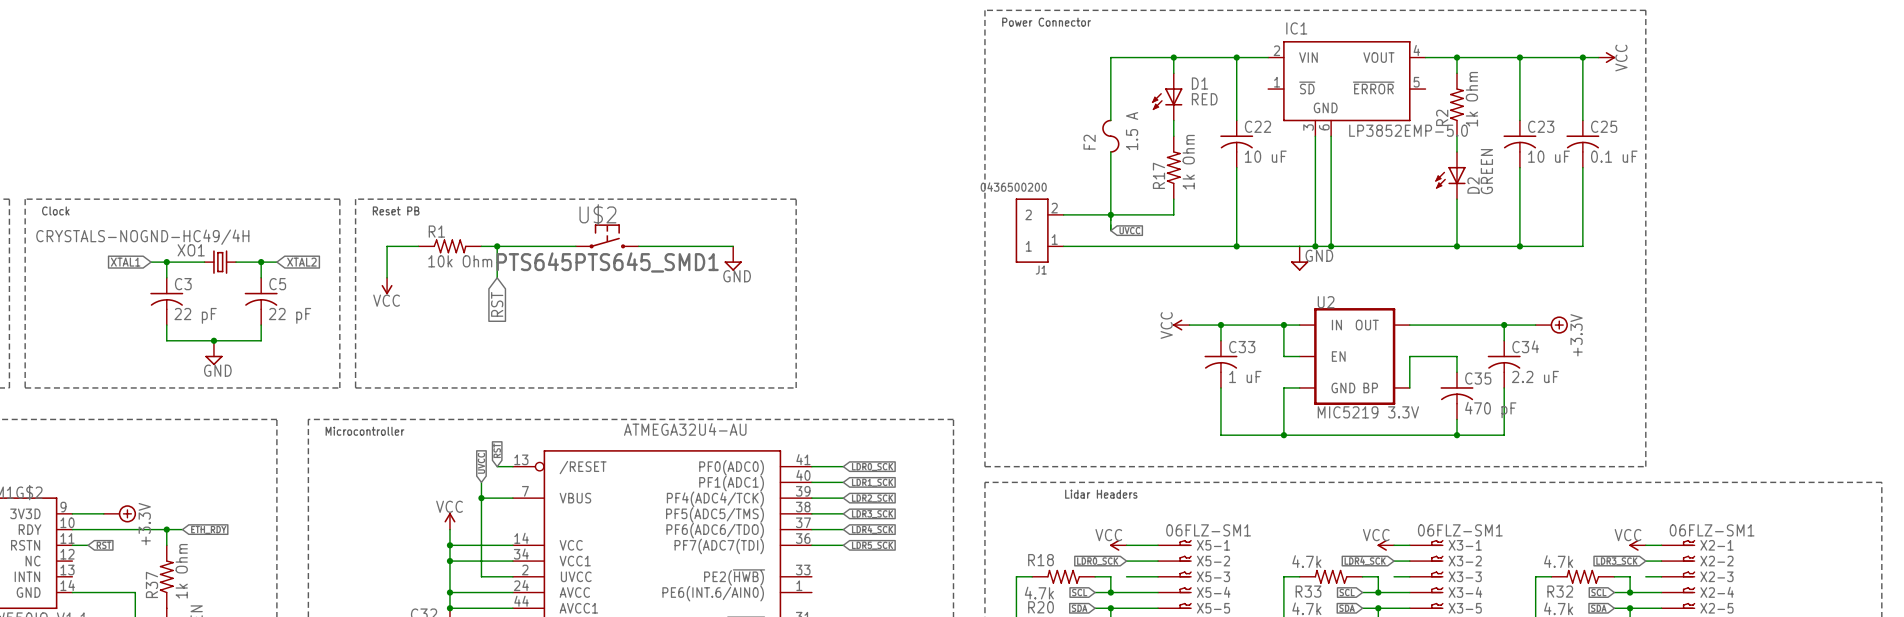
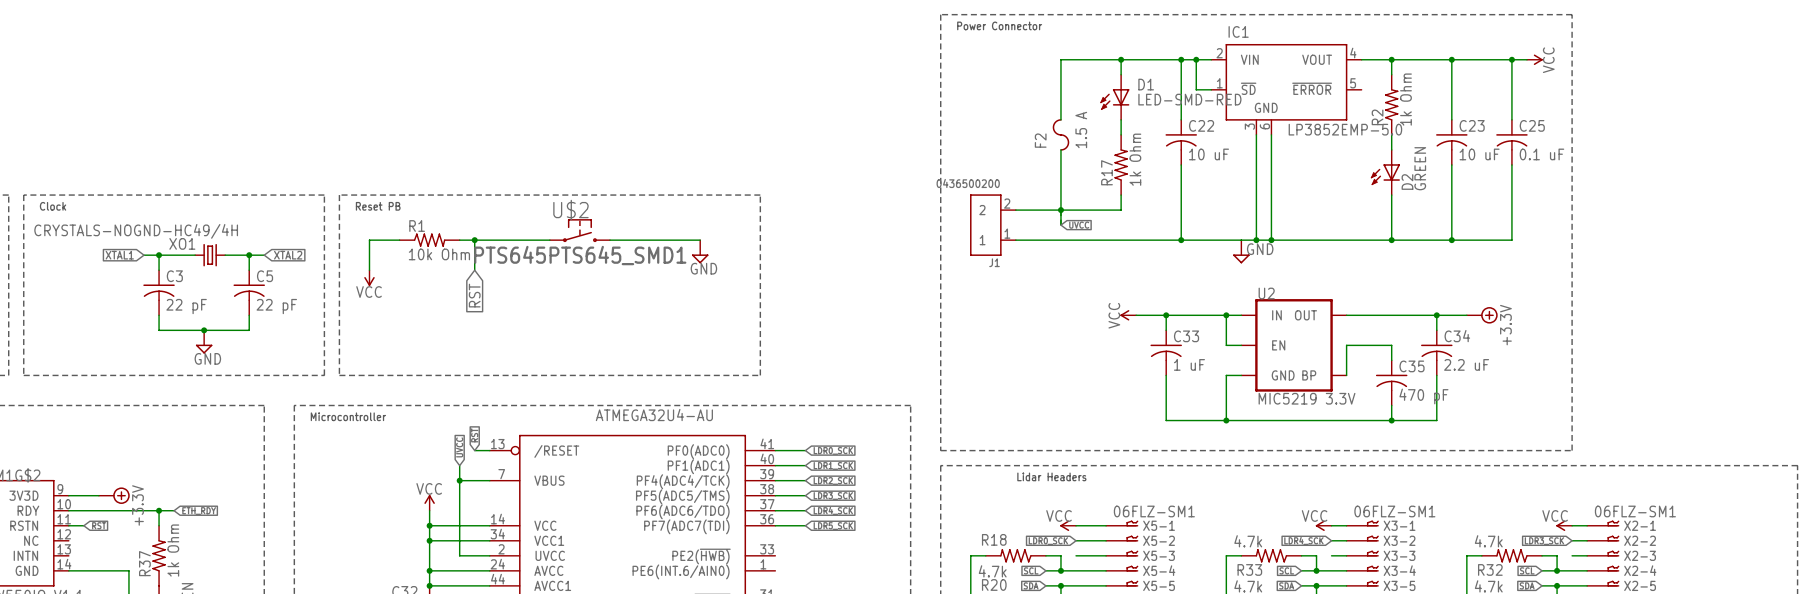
wire: none -> (1196, 59) (1196, 89) (1211, 89)
junction: none -> (1196, 59)
D1 value: RED (1204, 99) -> LED-SMD-RED (1189, 99)

